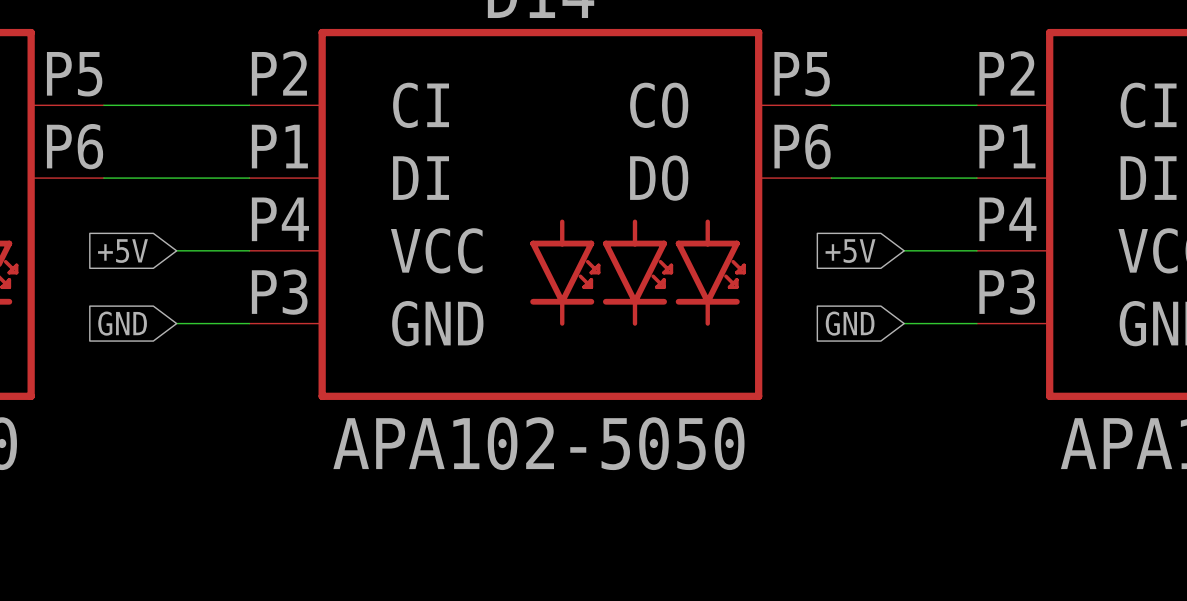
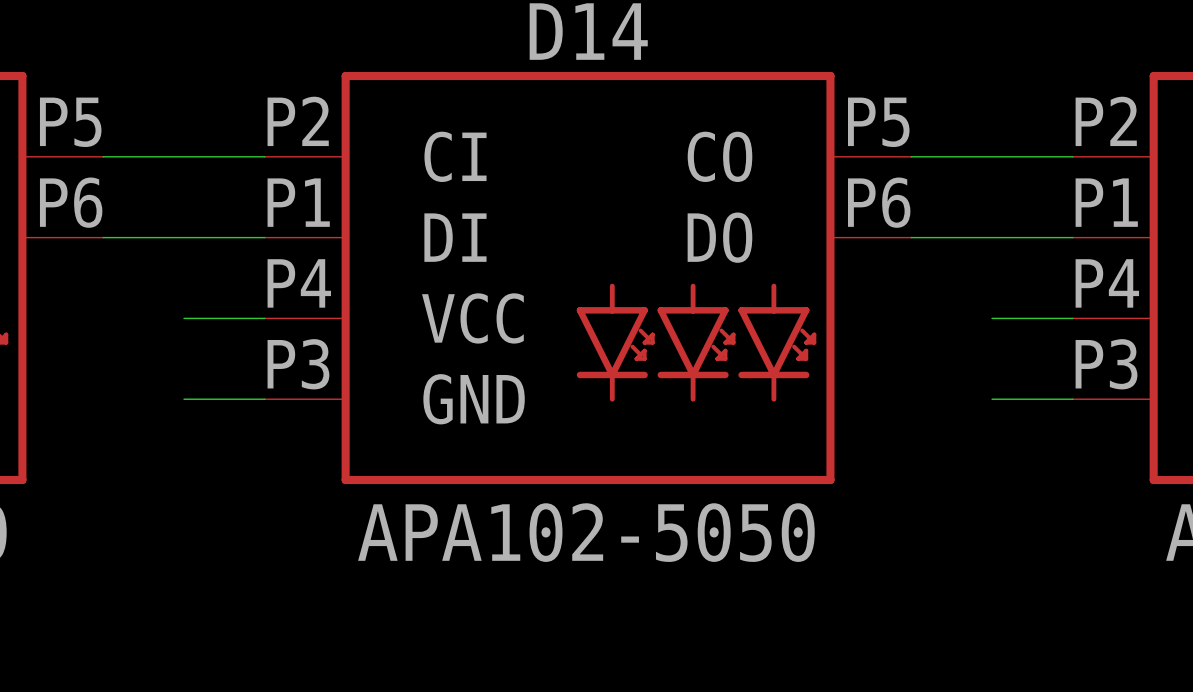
global label: +5V (122, 251) -> none
global label: +5V (850, 251) -> none
global label: GND (122, 323) -> none
global label: GND (850, 323) -> none

